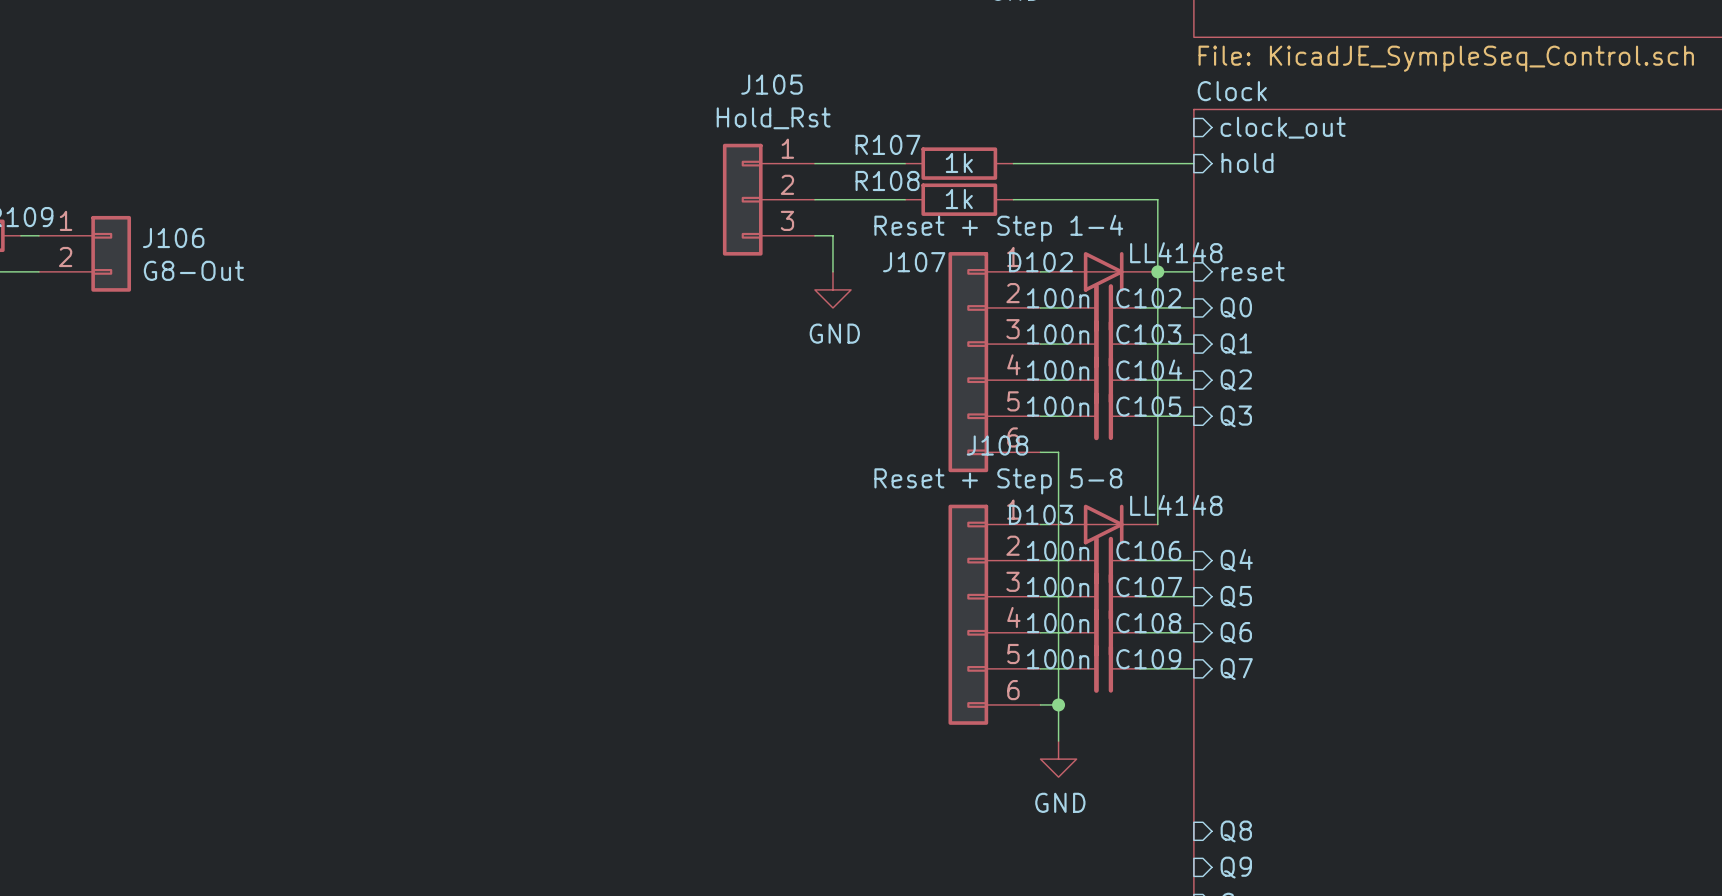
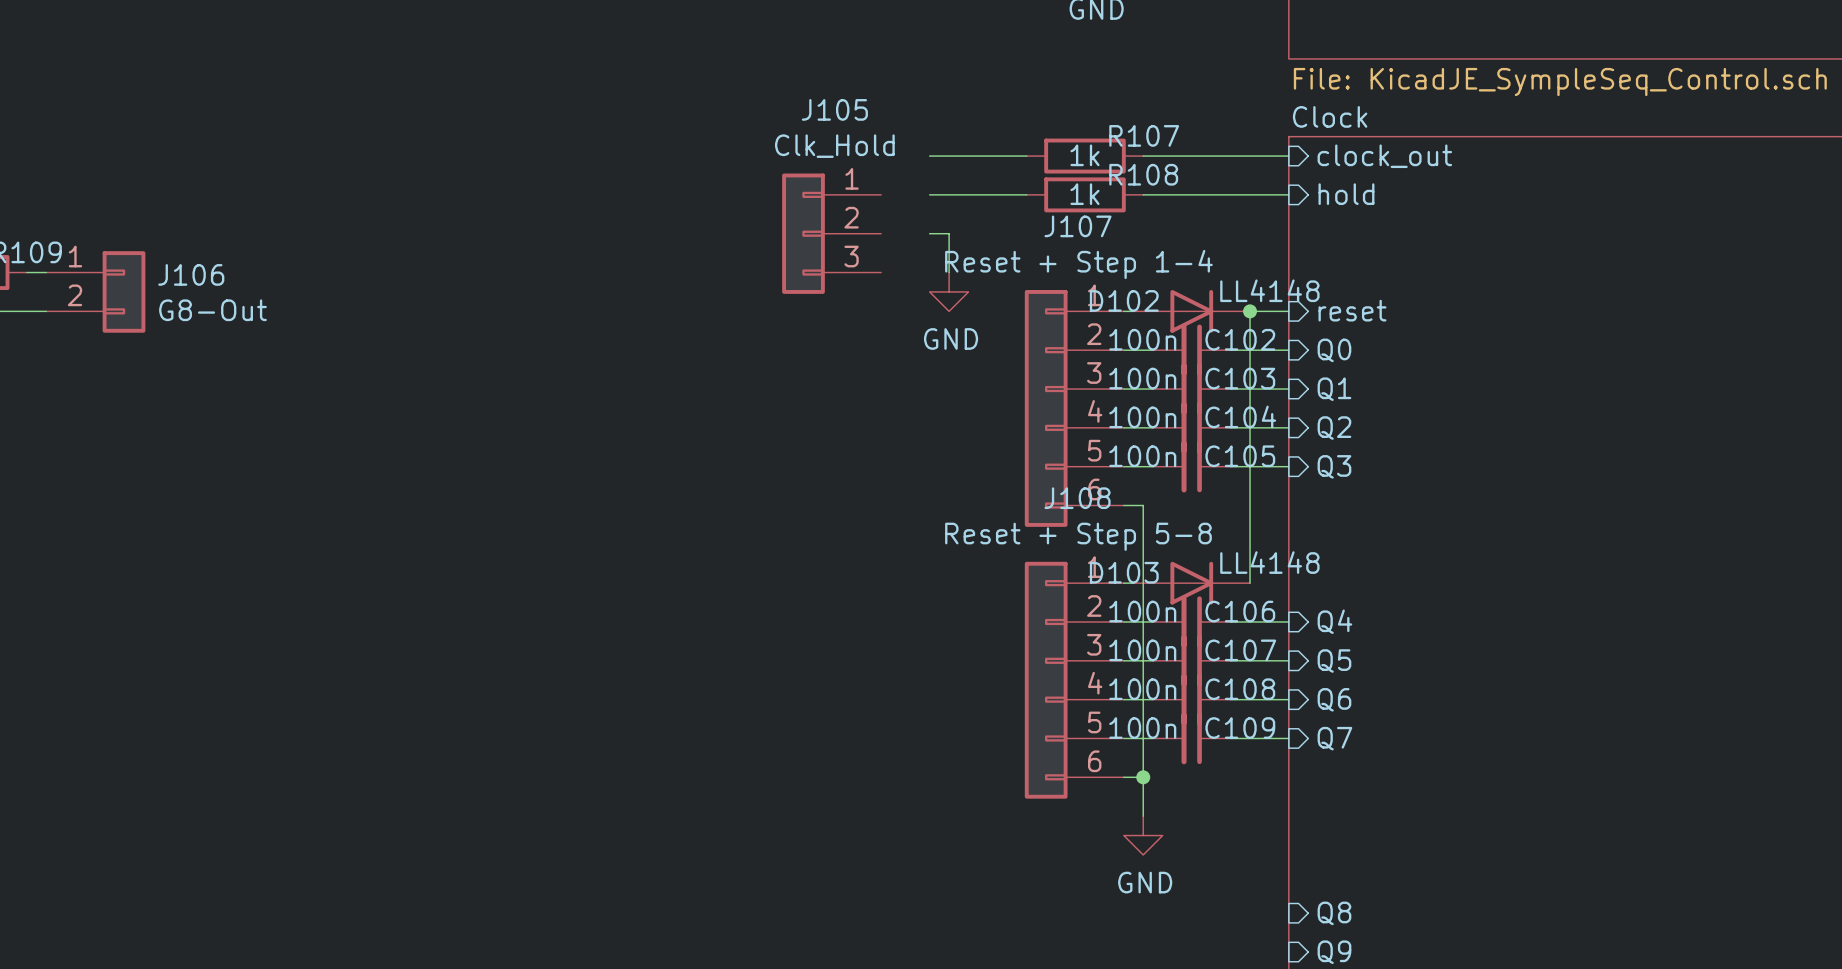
J105 value: Hold_Rst (773, 118) -> Clk_Hold (834, 146)
wire: none -> (929, 156) (1026, 156)
wire: none -> (1143, 156) (1288, 156)
R107 name position: R107 (887, 144) -> R107 (1144, 135)
wire: (814, 163) (860, 163) -> (978, 194) (1026, 194)
R107 position: (959, 163) -> (1084, 156)
wire: (1013, 163) (1058, 163) -> none
R108 name position: R108 (887, 180) -> R108 (1143, 174)
wire: (814, 199) (860, 199) -> none
wire: (878, 199) (905, 199) -> (949, 233) (949, 272)
R108 position: (959, 199) -> (1084, 194)
wire: (1013, 199) (1157, 199) (1157, 271) -> none
wire: (814, 235) (832, 235) (832, 271) -> none
J107 name position: J107 (914, 262) -> J107 (1078, 226)
power symbol position: GND (832, 289) -> GND (949, 291)

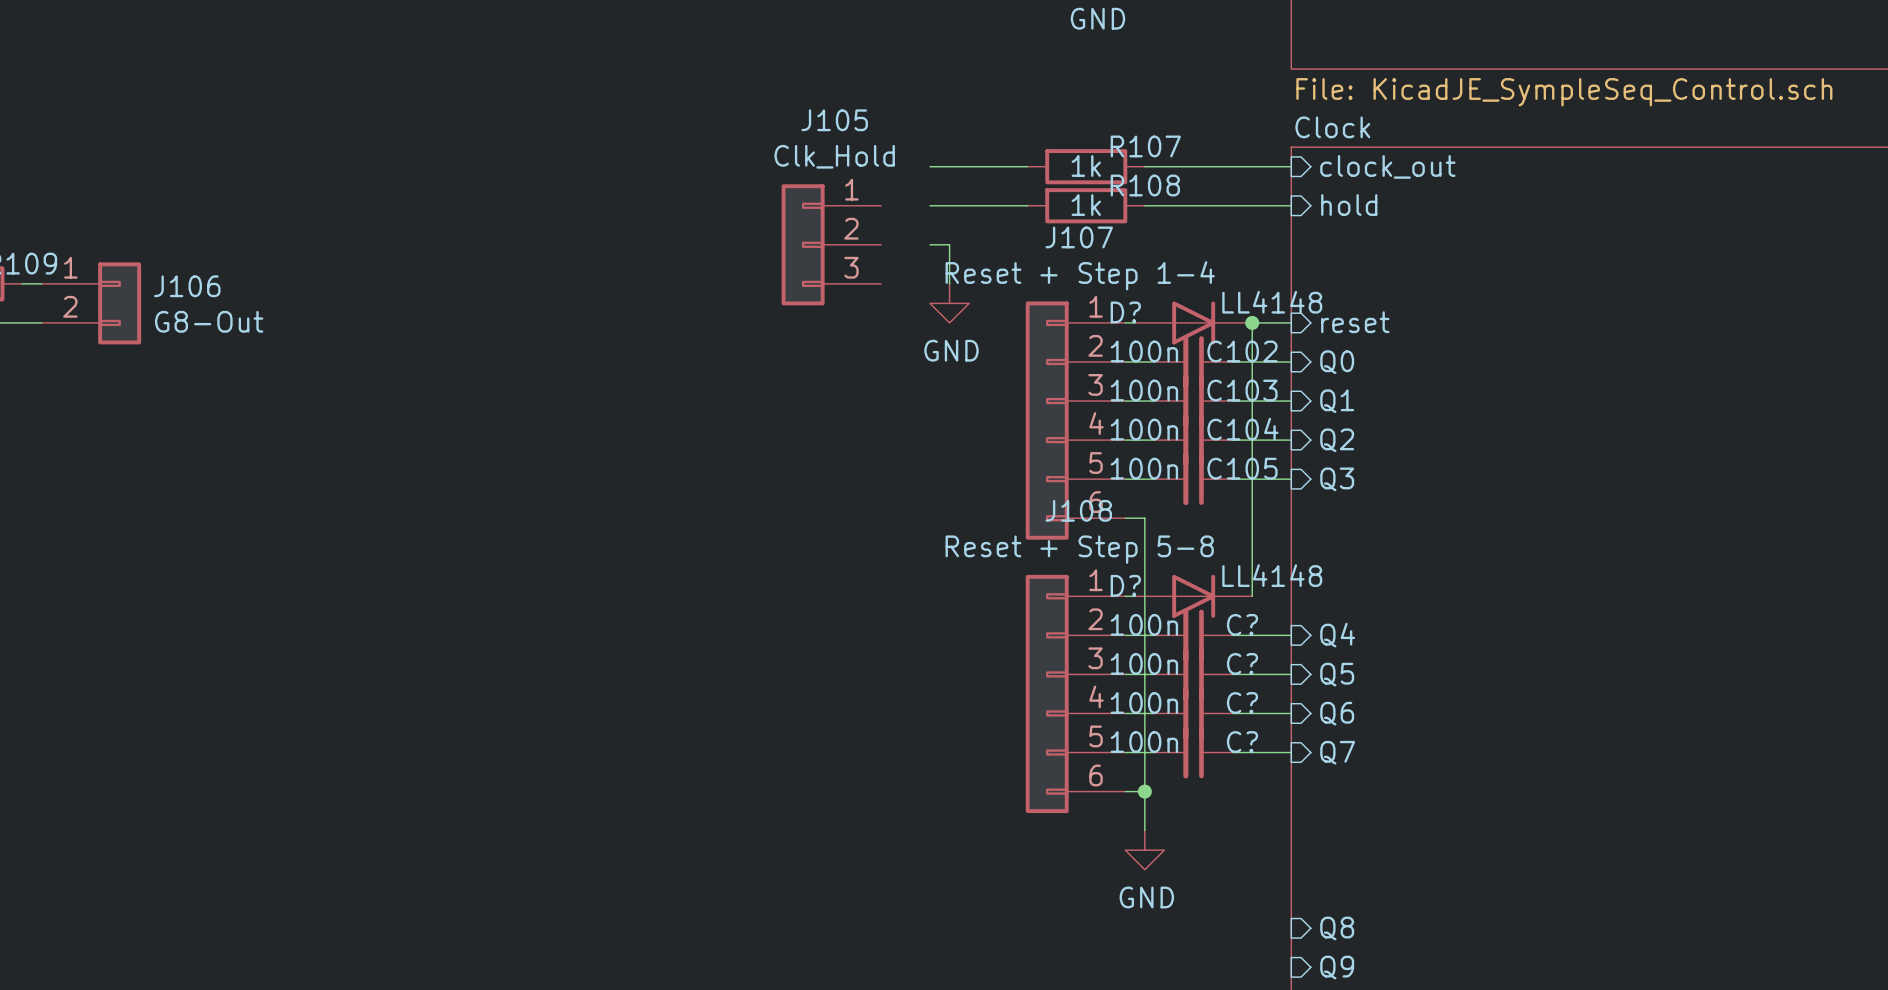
D102 name: D102 (1124, 300) -> D? (1125, 312)
D103 name: D103 (1124, 572) -> D? (1125, 585)
C106 name: C106 (1240, 611) -> C? (1242, 624)
C107 name: C107 (1240, 650) -> C? (1242, 663)
C108 name: C108 (1240, 689) -> C? (1242, 702)
C109 name: C109 (1240, 728) -> C? (1242, 742)

